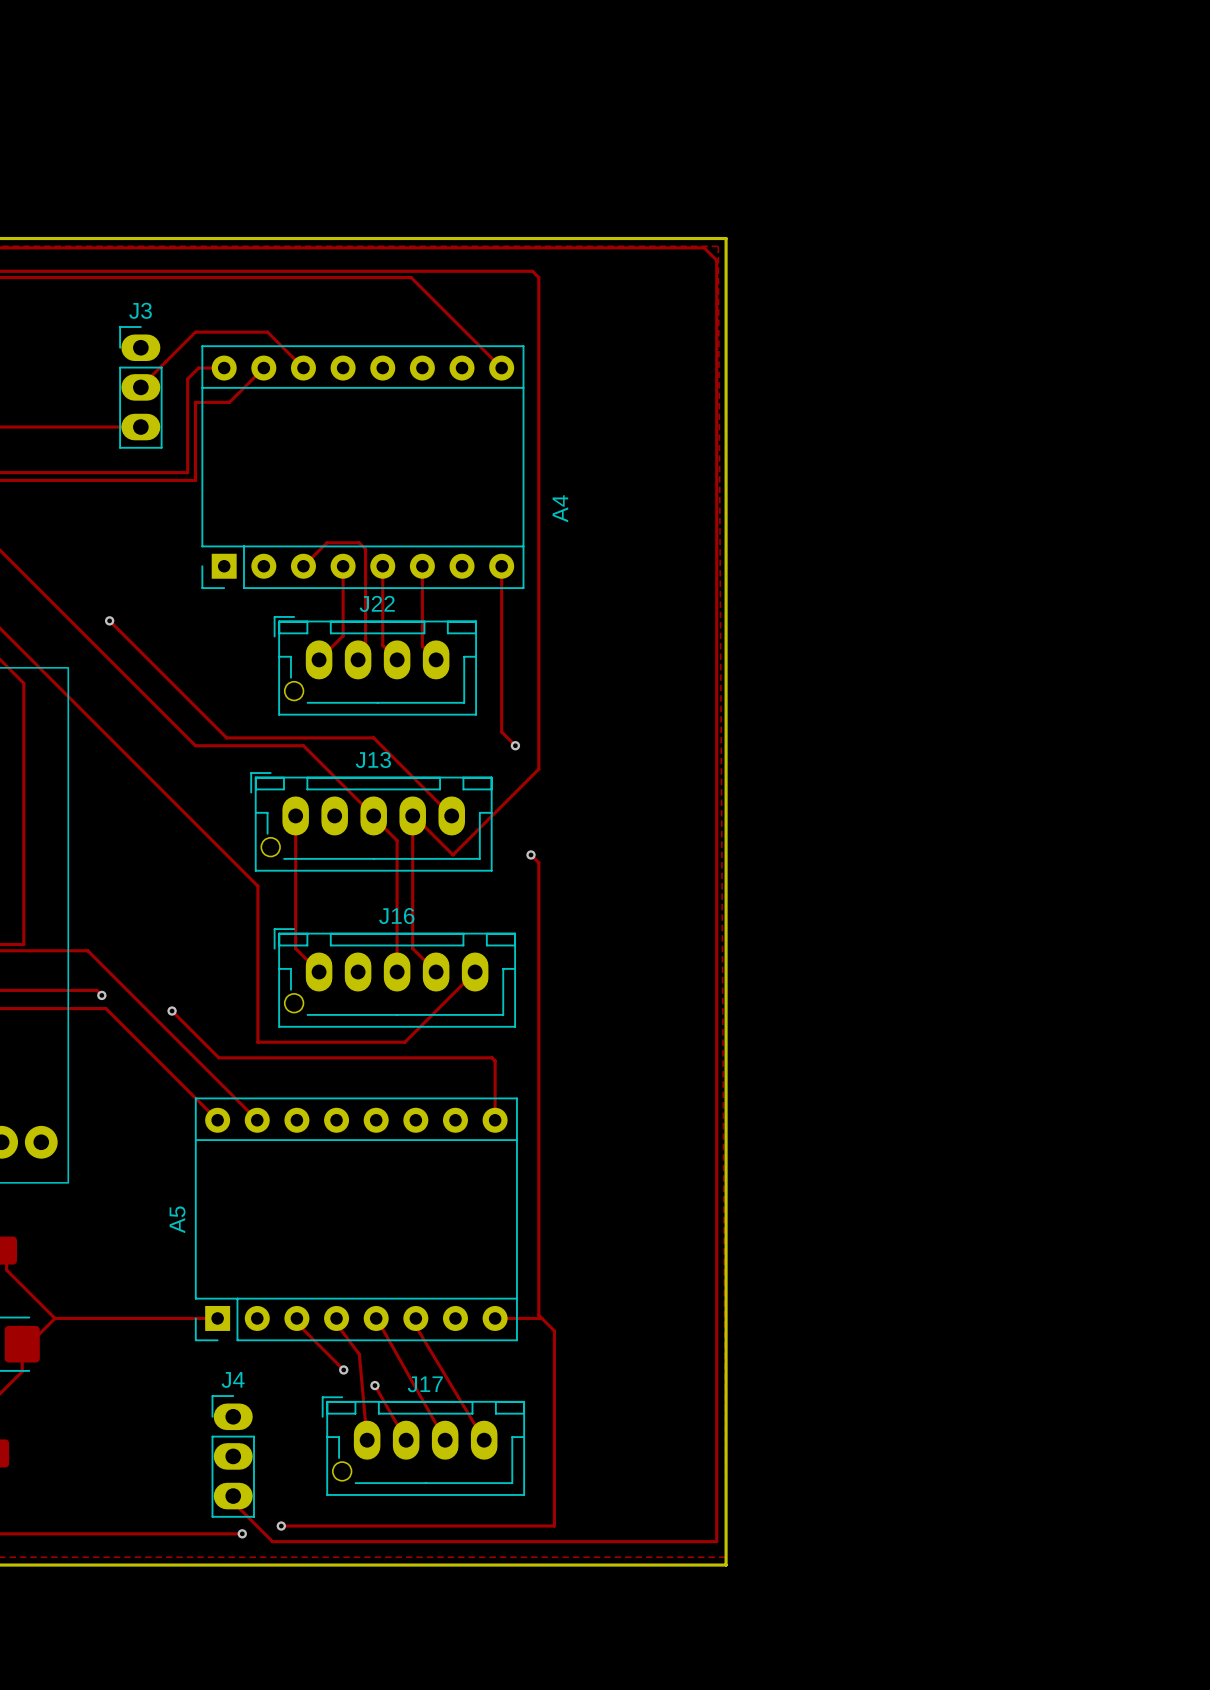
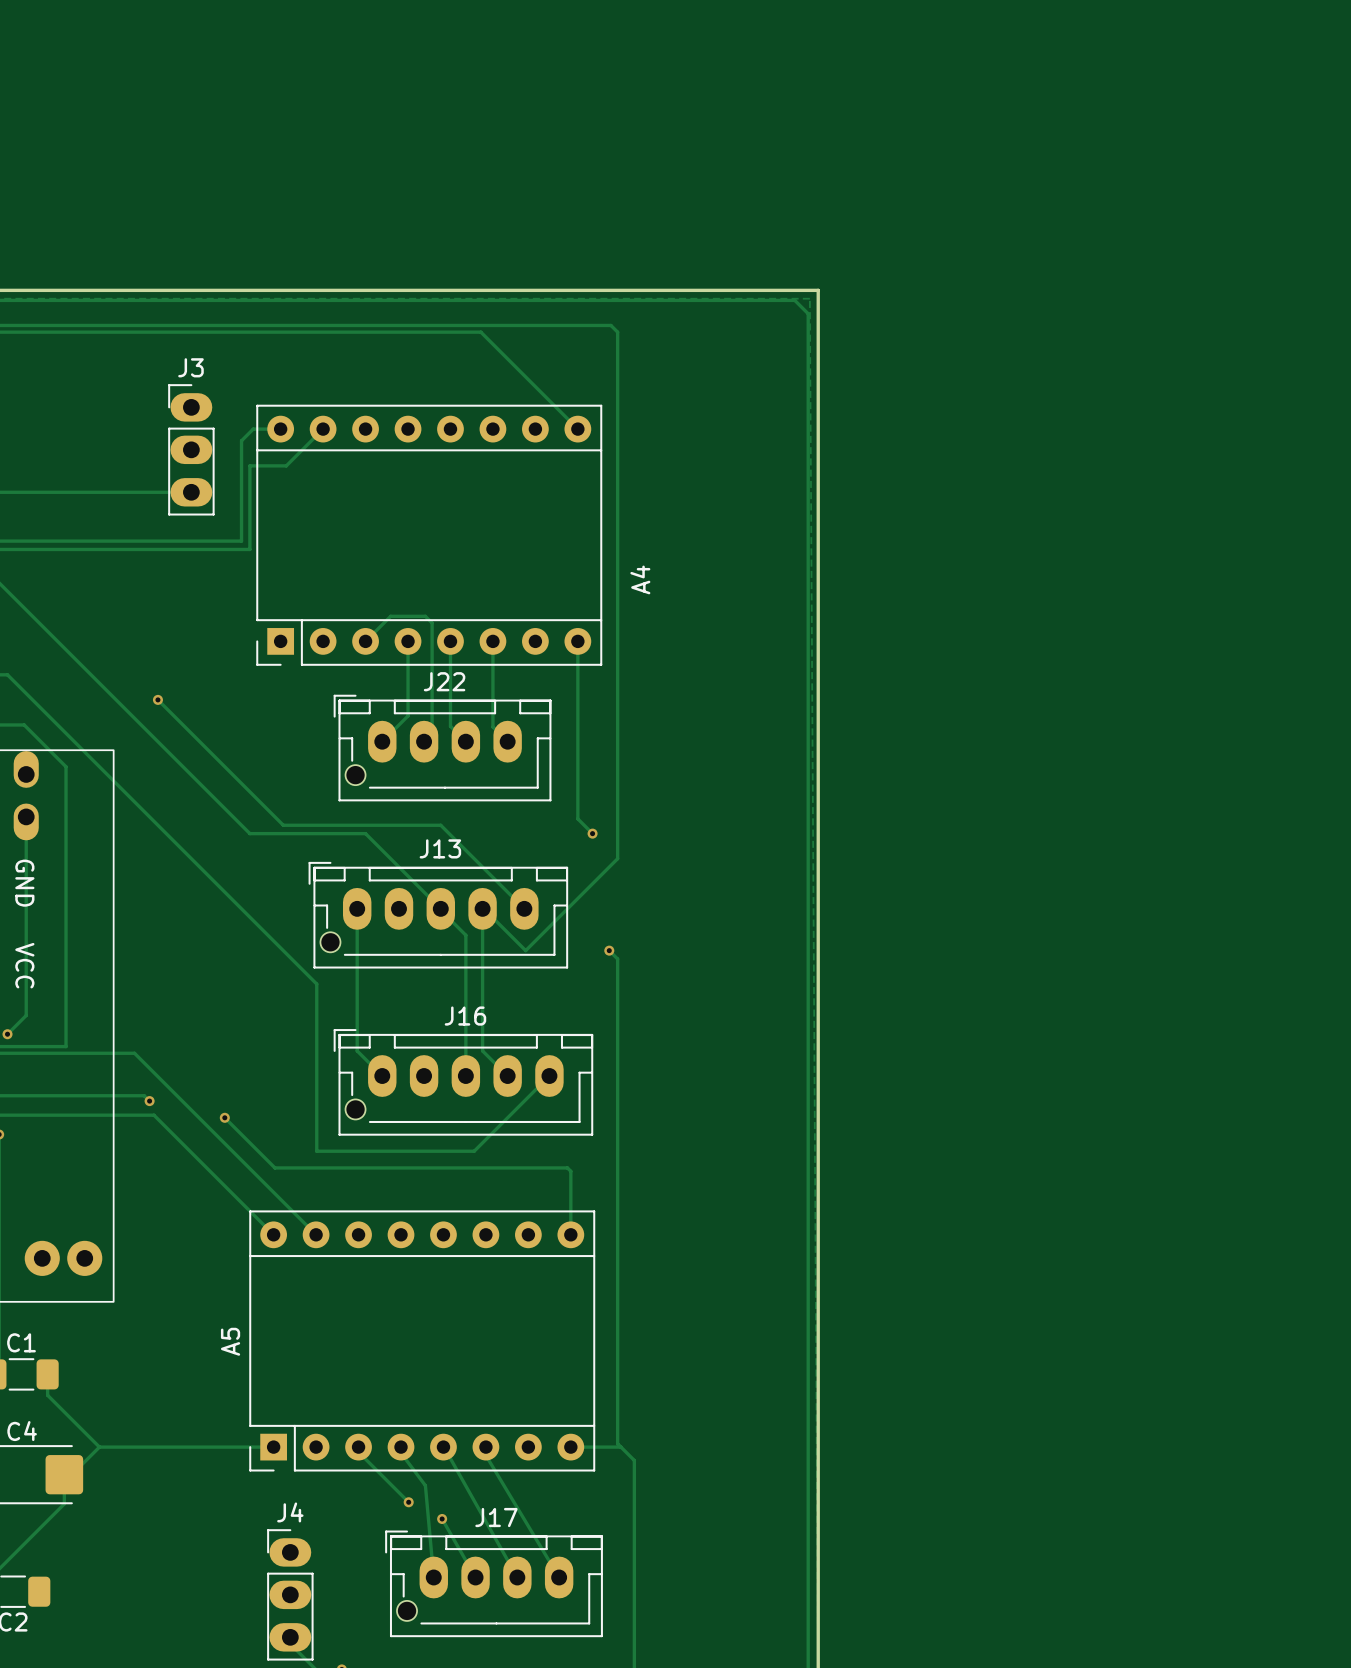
track: (303, 368) (267, 332) (195, 332) (140, 387) -> none

